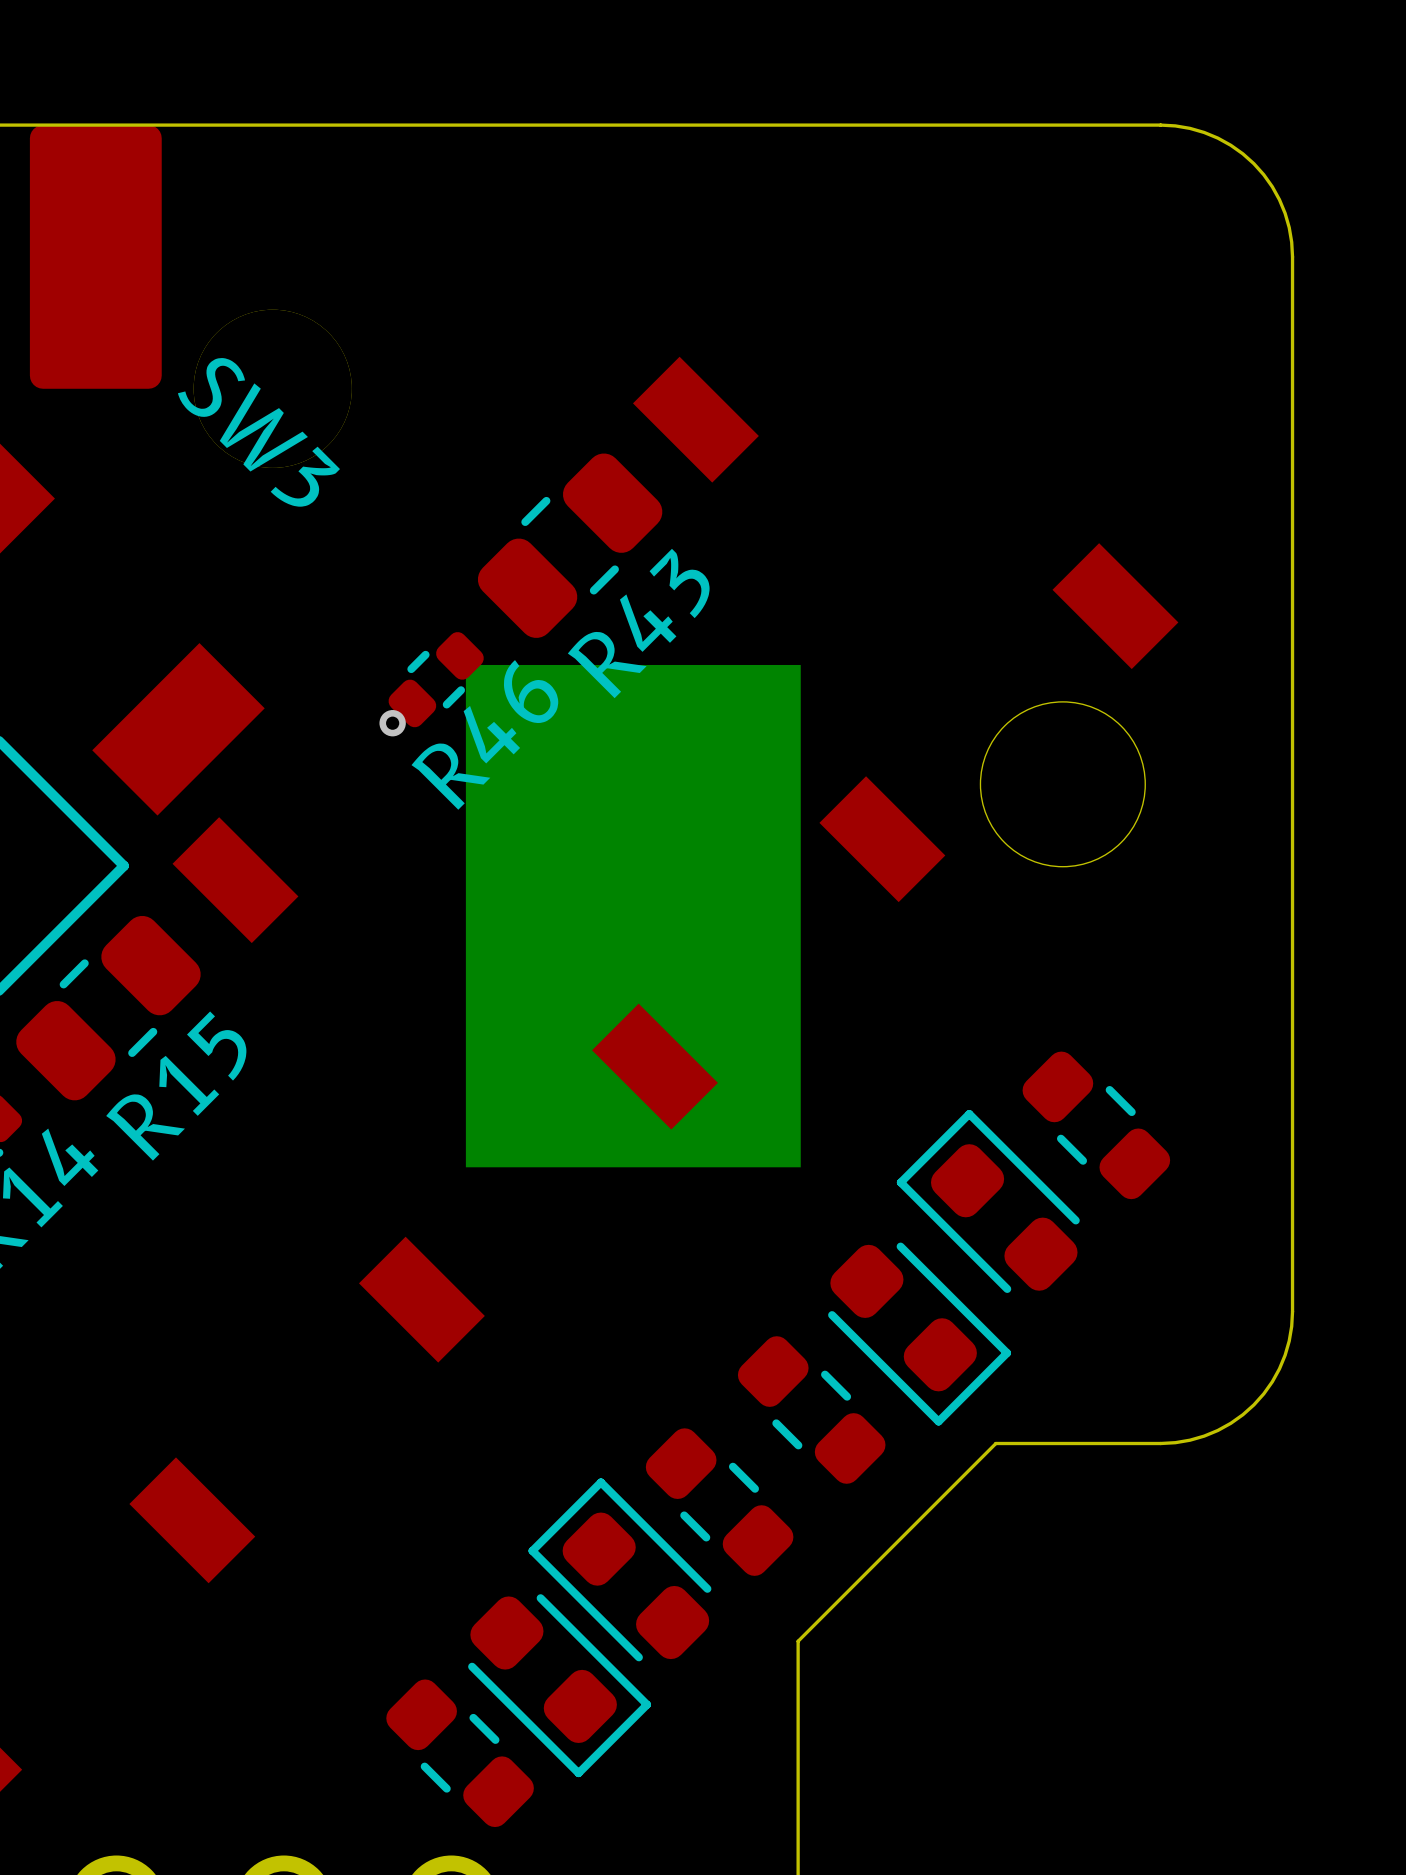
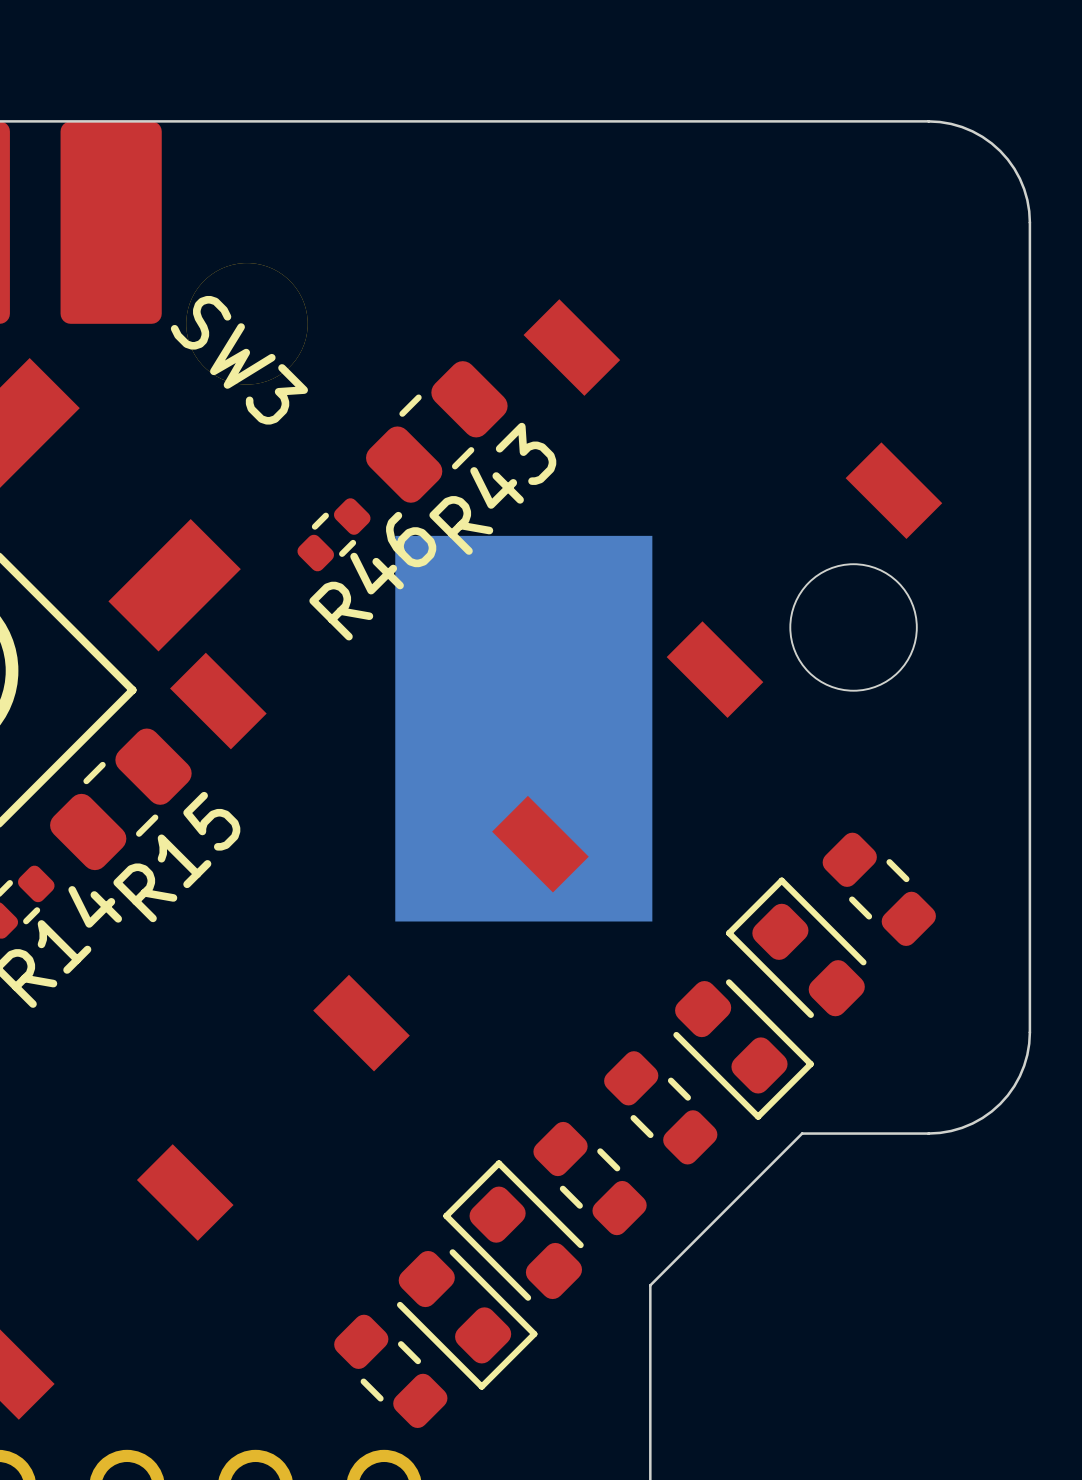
R43 position: (570, 545) -> (436, 431)
R46 position: (436, 679) -> (333, 534)
via: (392, 723) -> none

